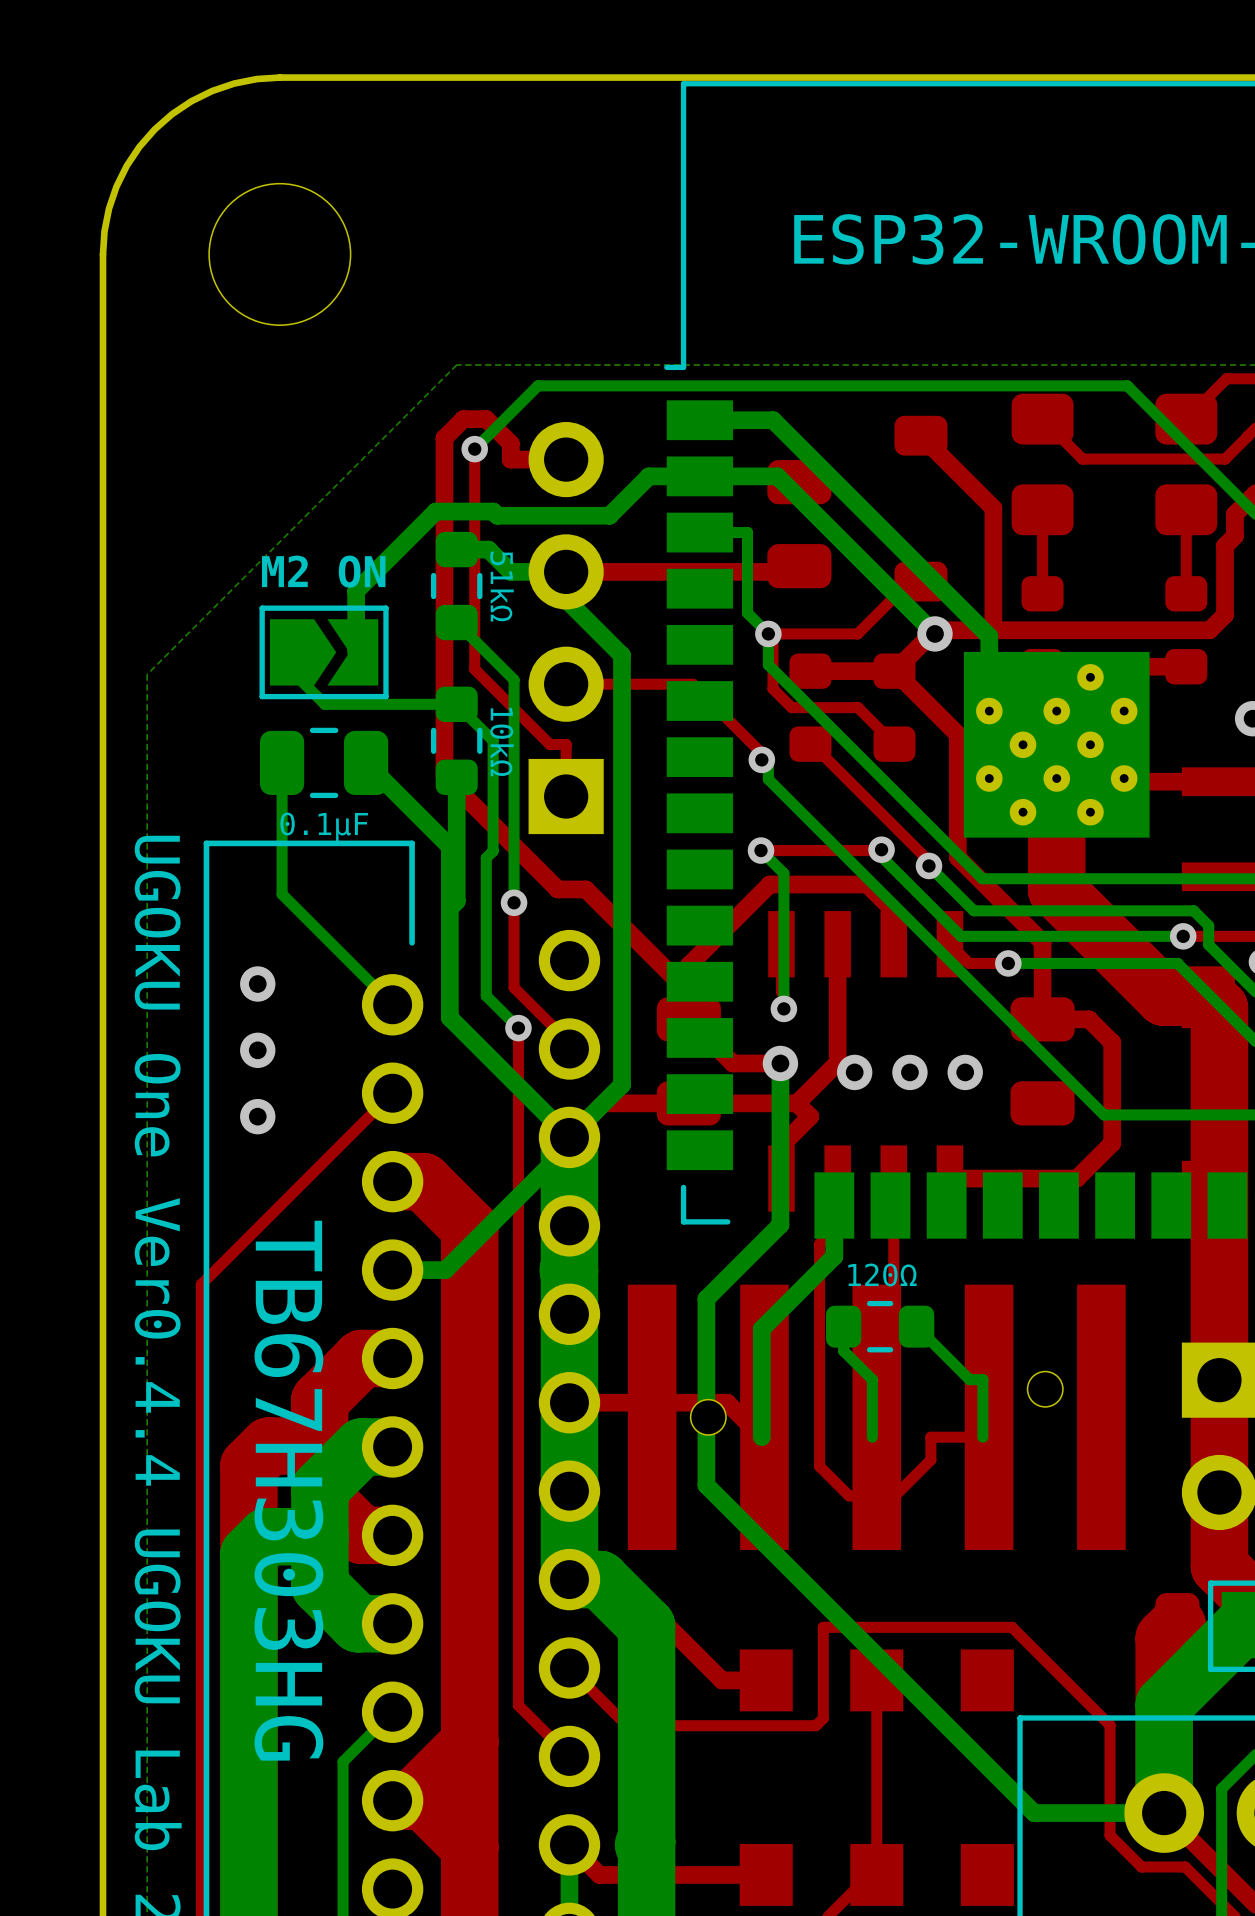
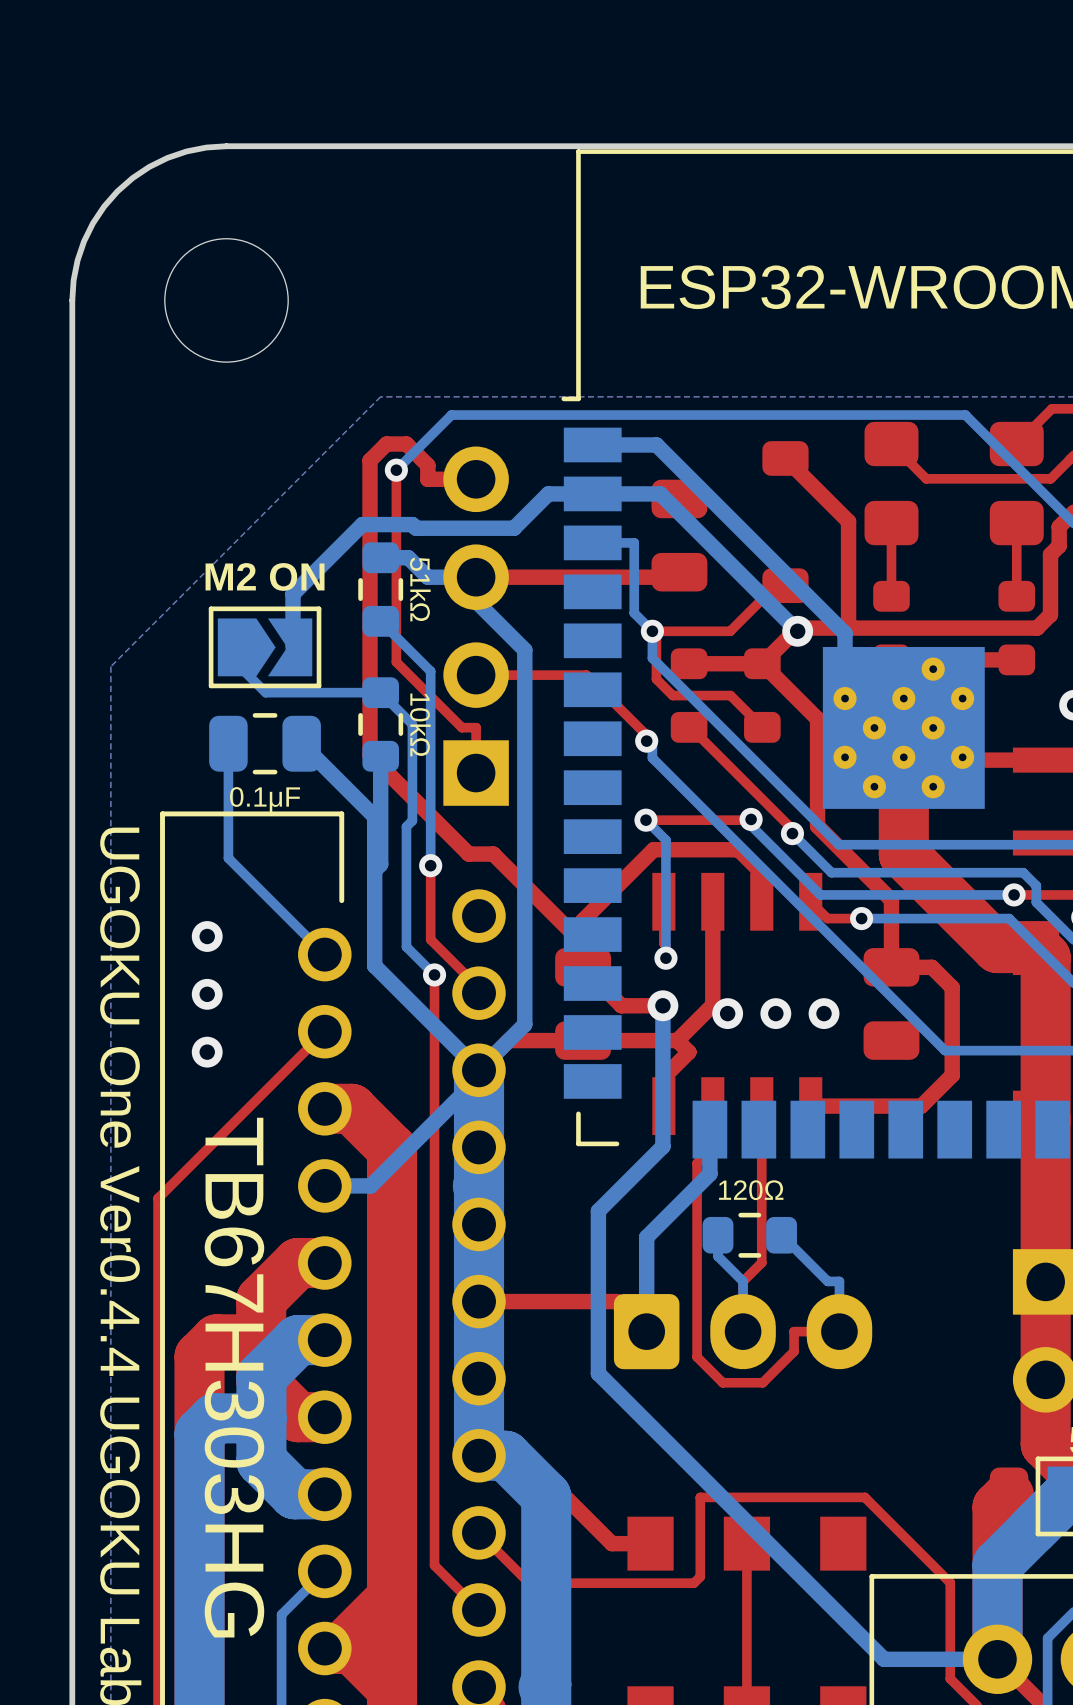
part footprint: [627, 1284, 1126, 1550] -> [613, 1294, 873, 1370]

